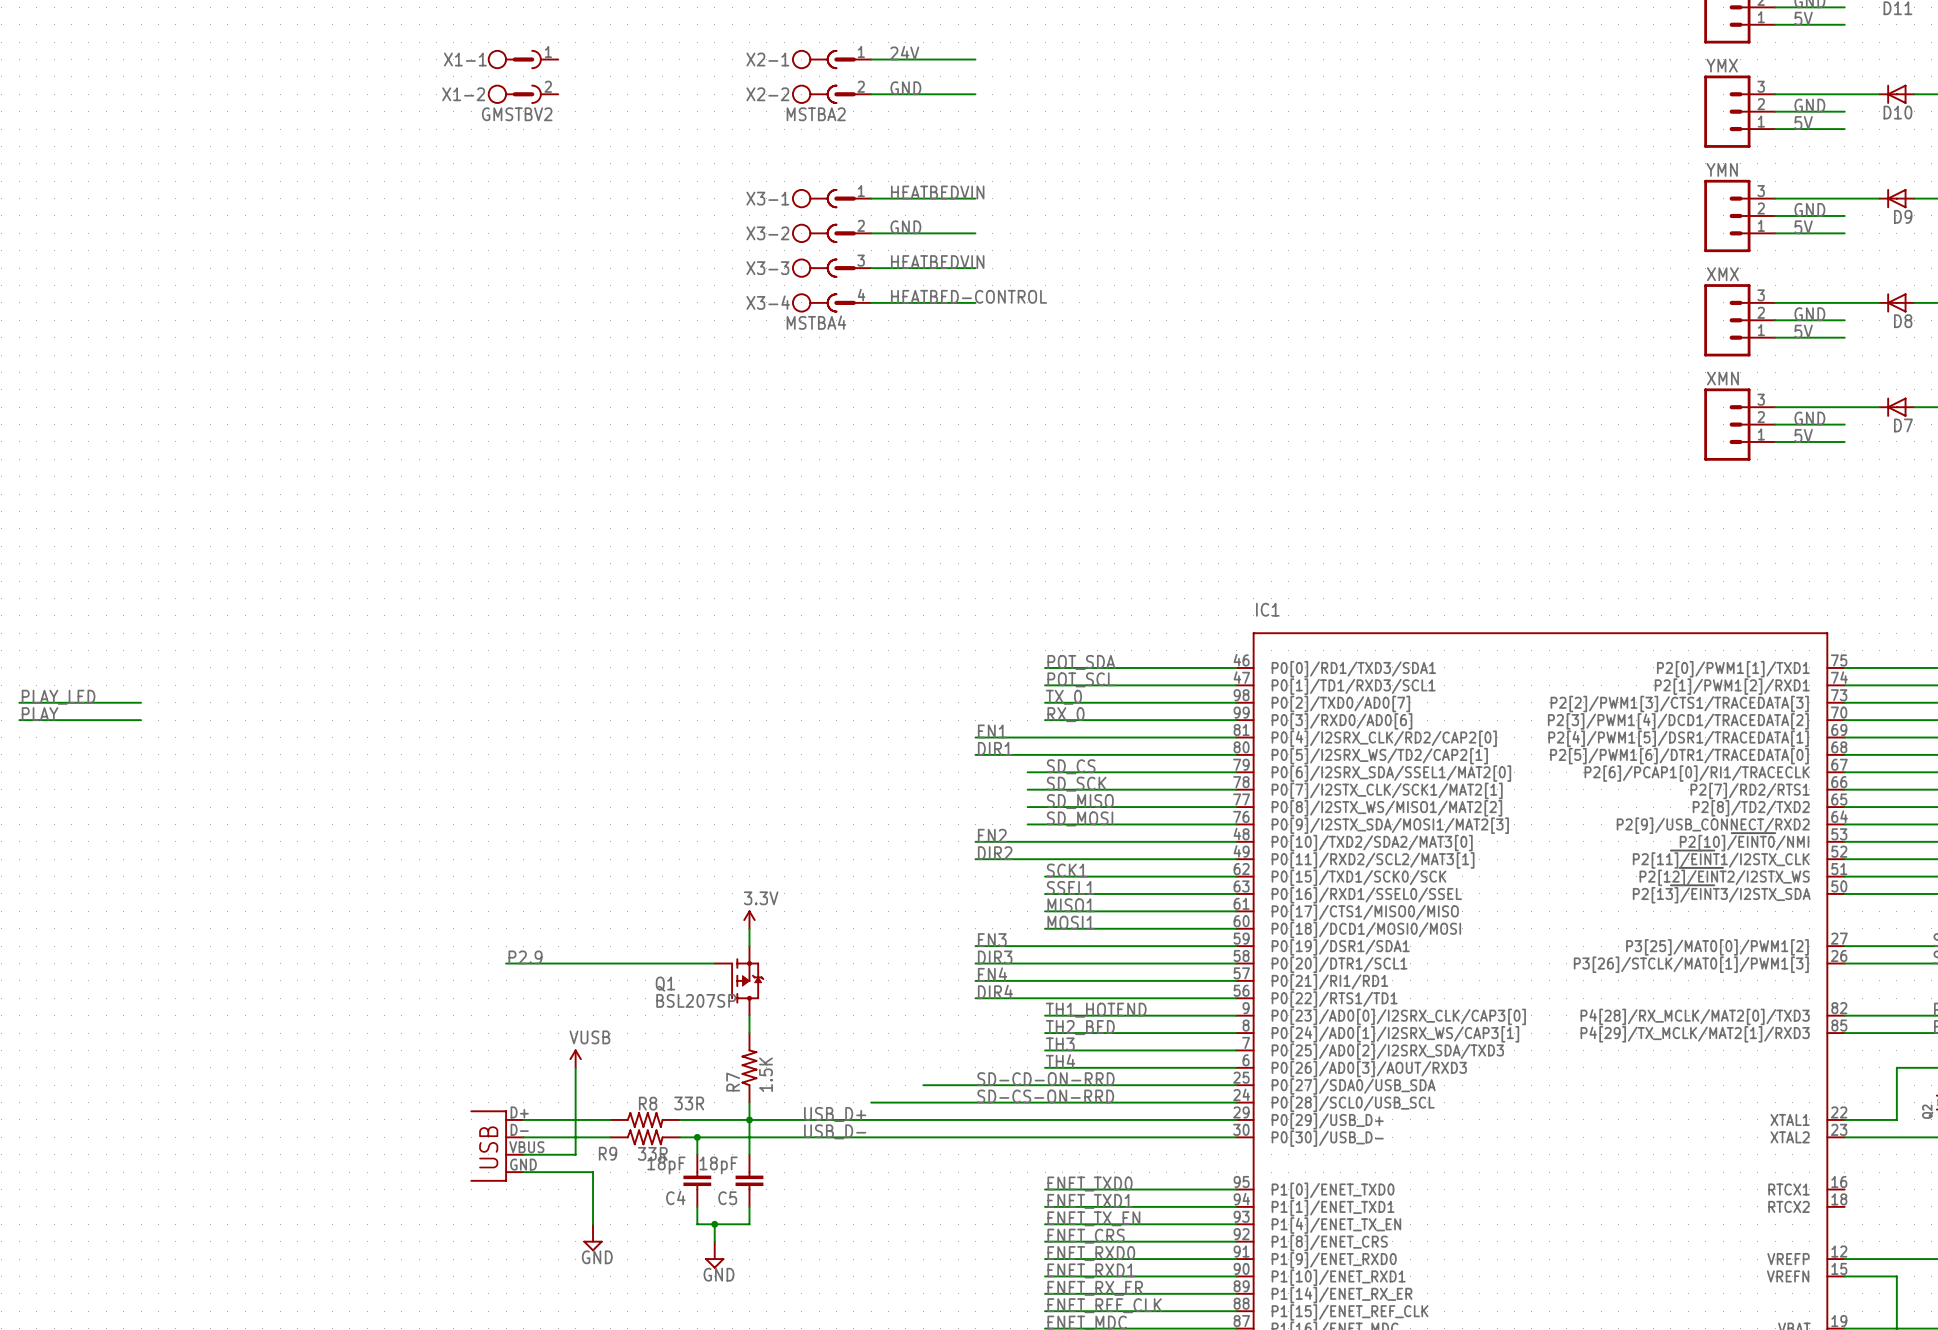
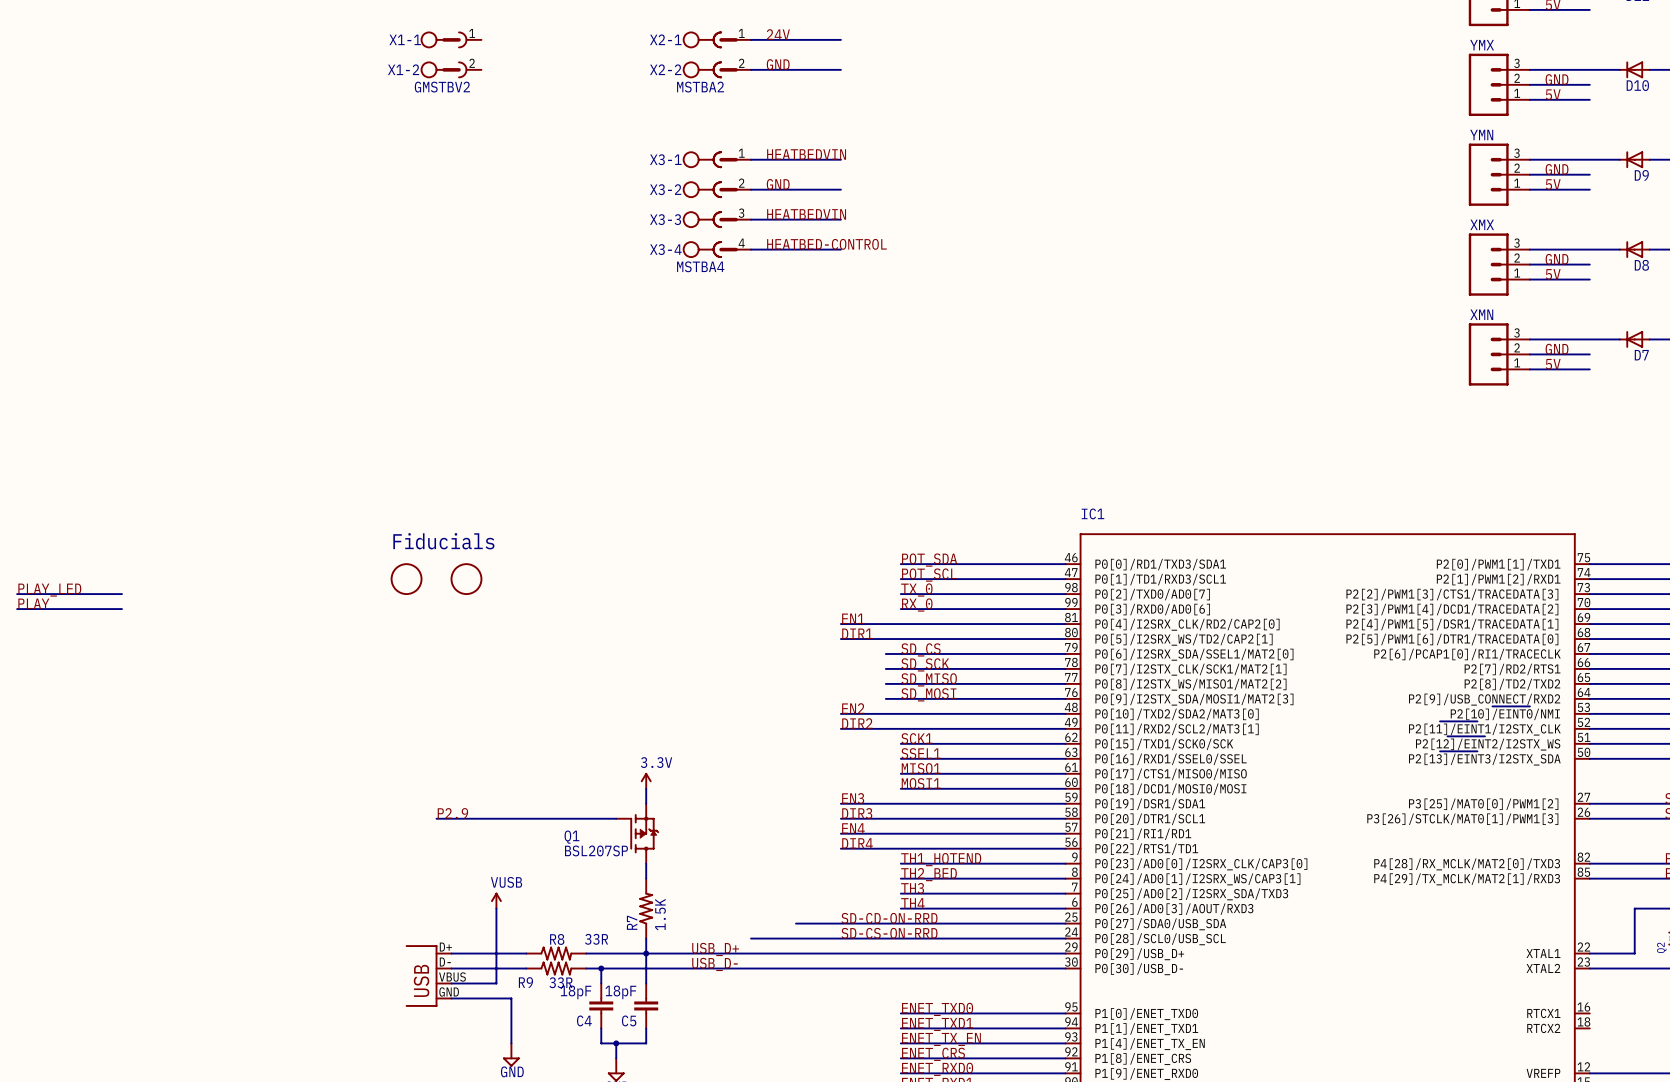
text: none -> Fiducials (443, 541)
part: none -> (406, 579)
part: none -> (466, 579)

